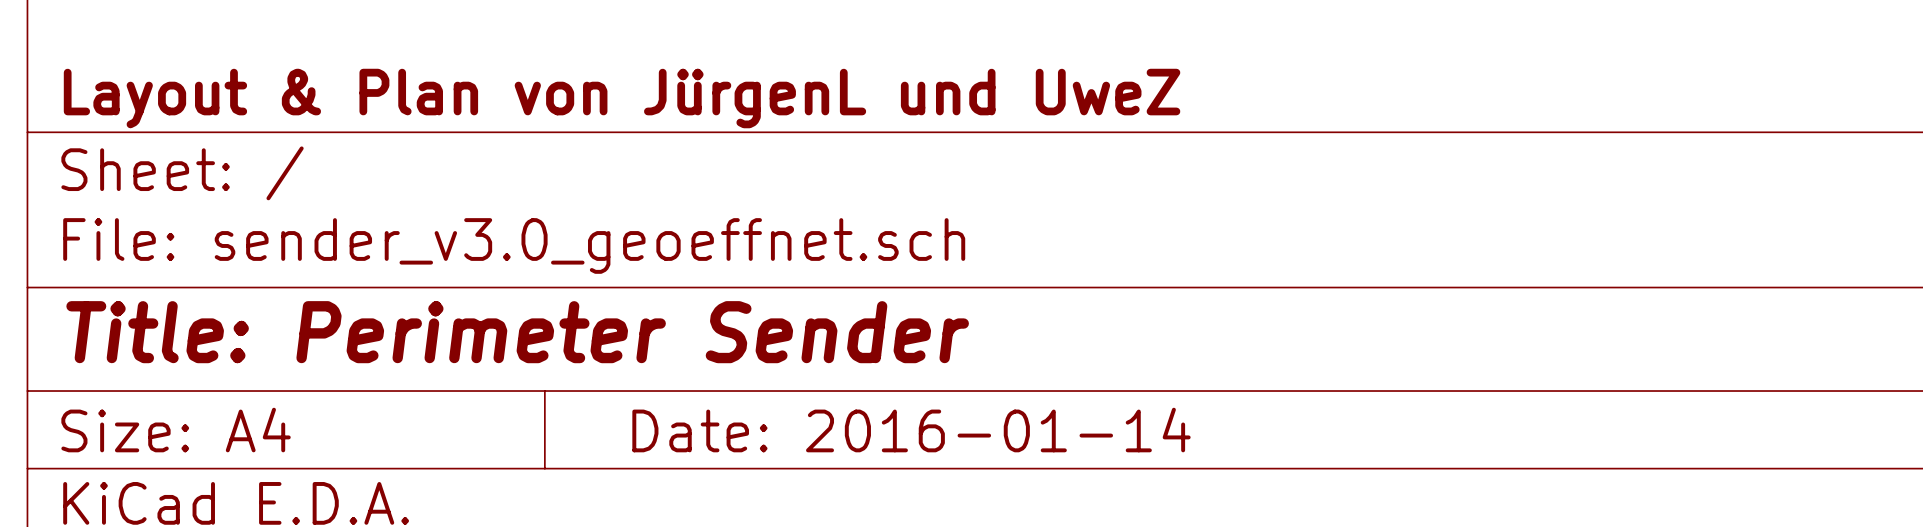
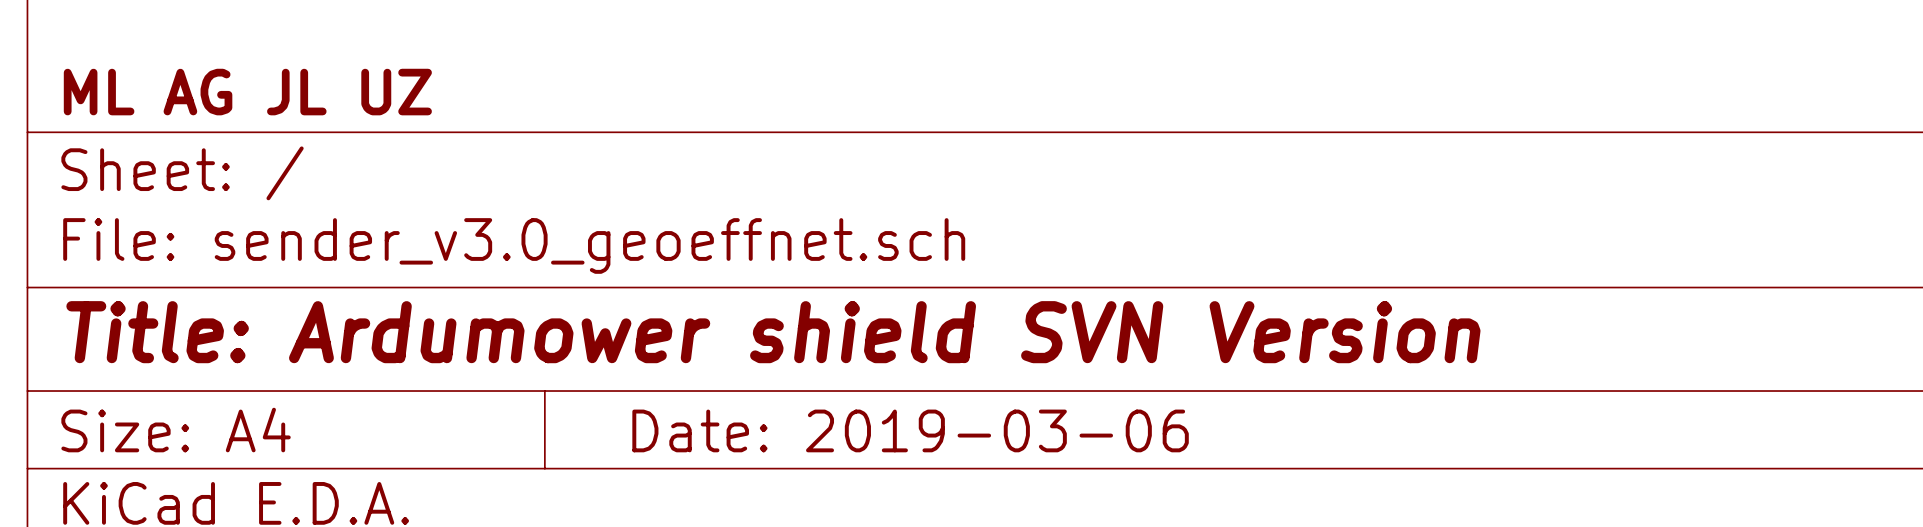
title block: Layout & Plan von JürgenL und UweZ (622, 98) -> ML AG JL UZ (247, 92)
title block: Title: Perimeter Sender (517, 332) -> Title: Ardumower shield SVN Version (773, 332)
title block: Date: 2016-01-14 (911, 430) -> Date: 2019-03-06 (910, 430)

